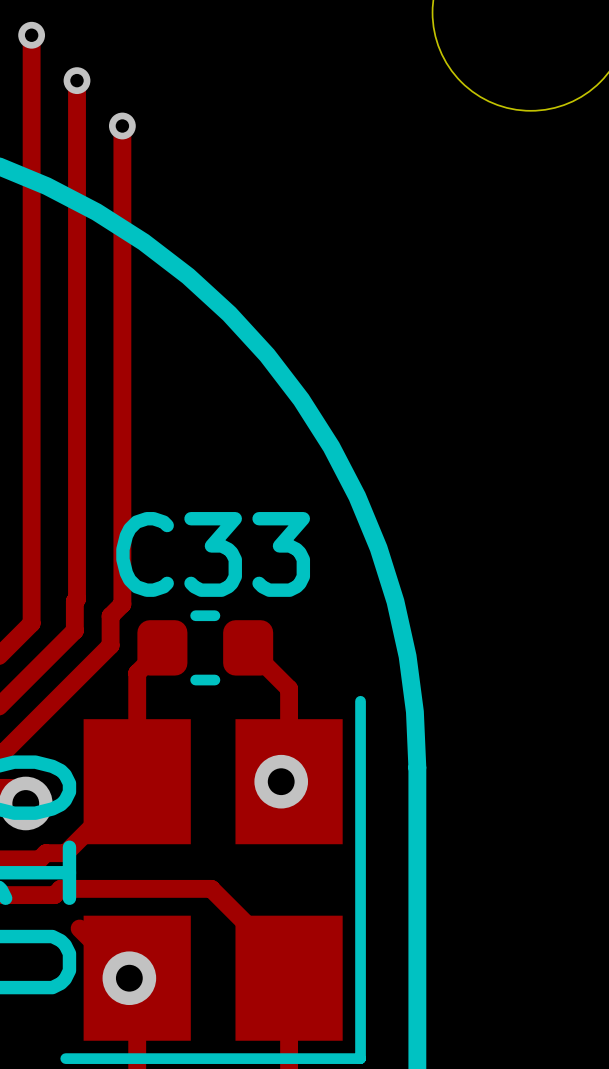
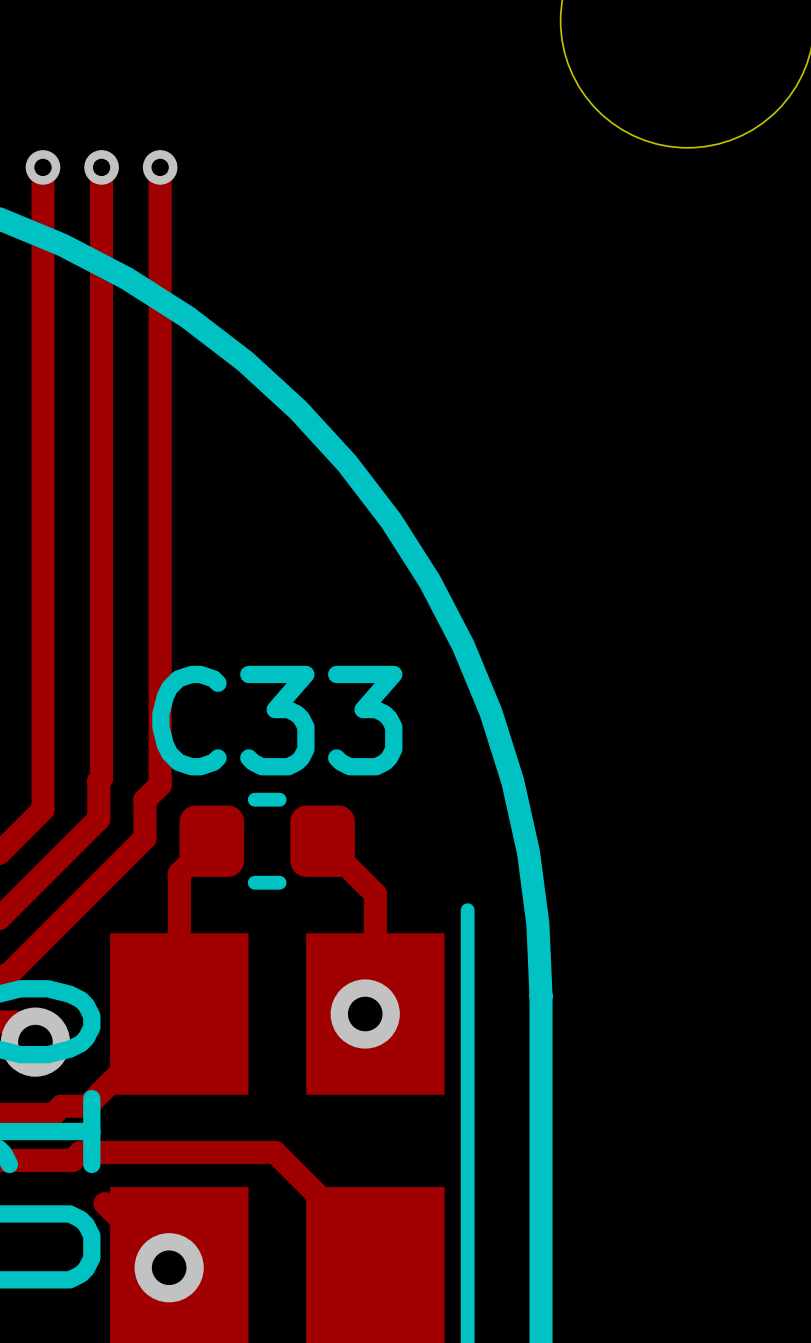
track: (31, 35) (31, 126) -> none
via: (31, 35) -> none
track: (77, 80) (77, 126) -> none
via: (77, 80) -> none
via: none -> (42, 167)
via: none -> (101, 167)

